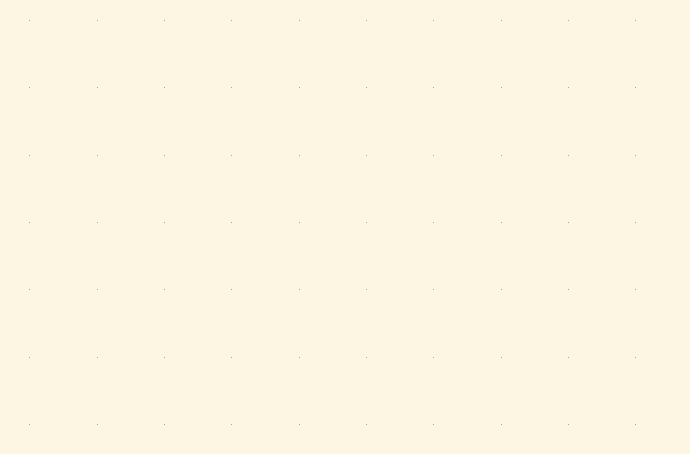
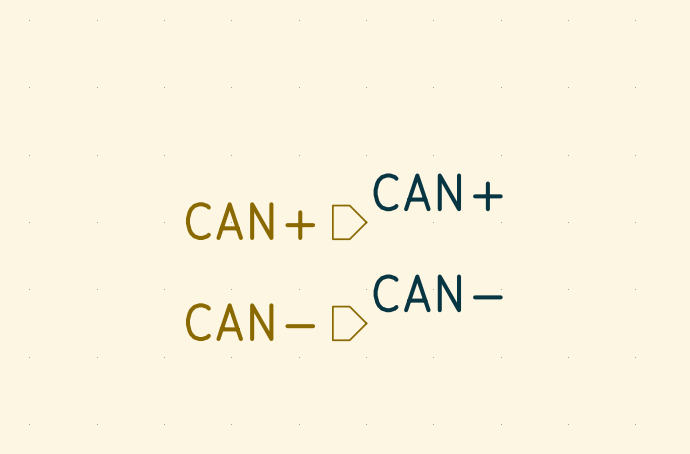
label: none -> CAN+ (438, 192)
hierarchical label: none -> CAN+ (250, 221)
label: none -> CAN- (438, 293)
hierarchical label: none -> CAN- (250, 322)

